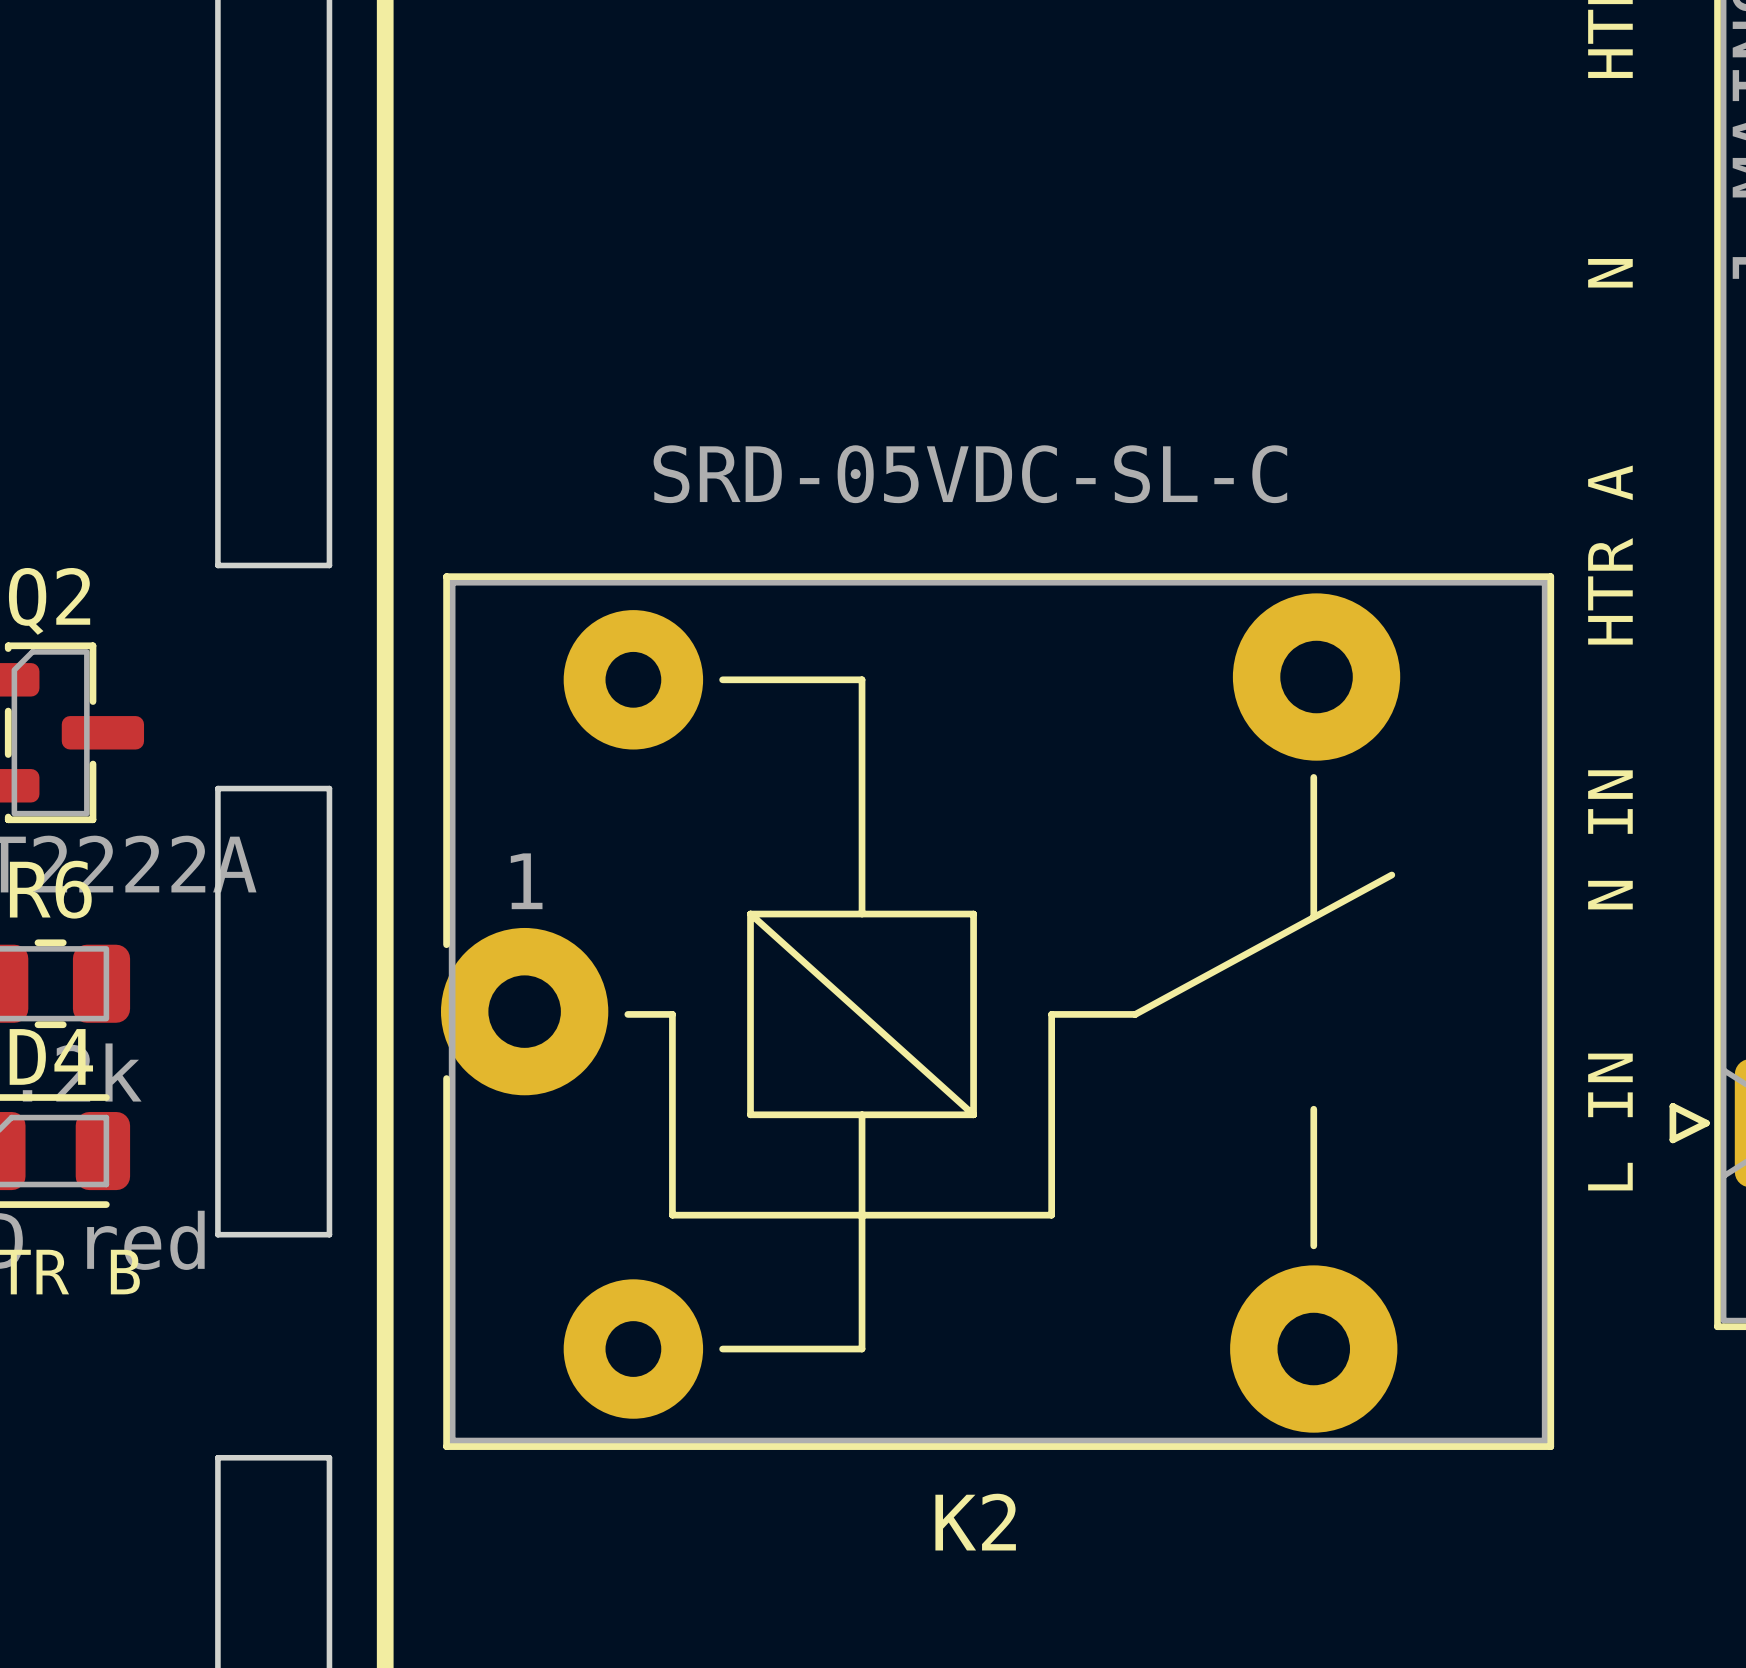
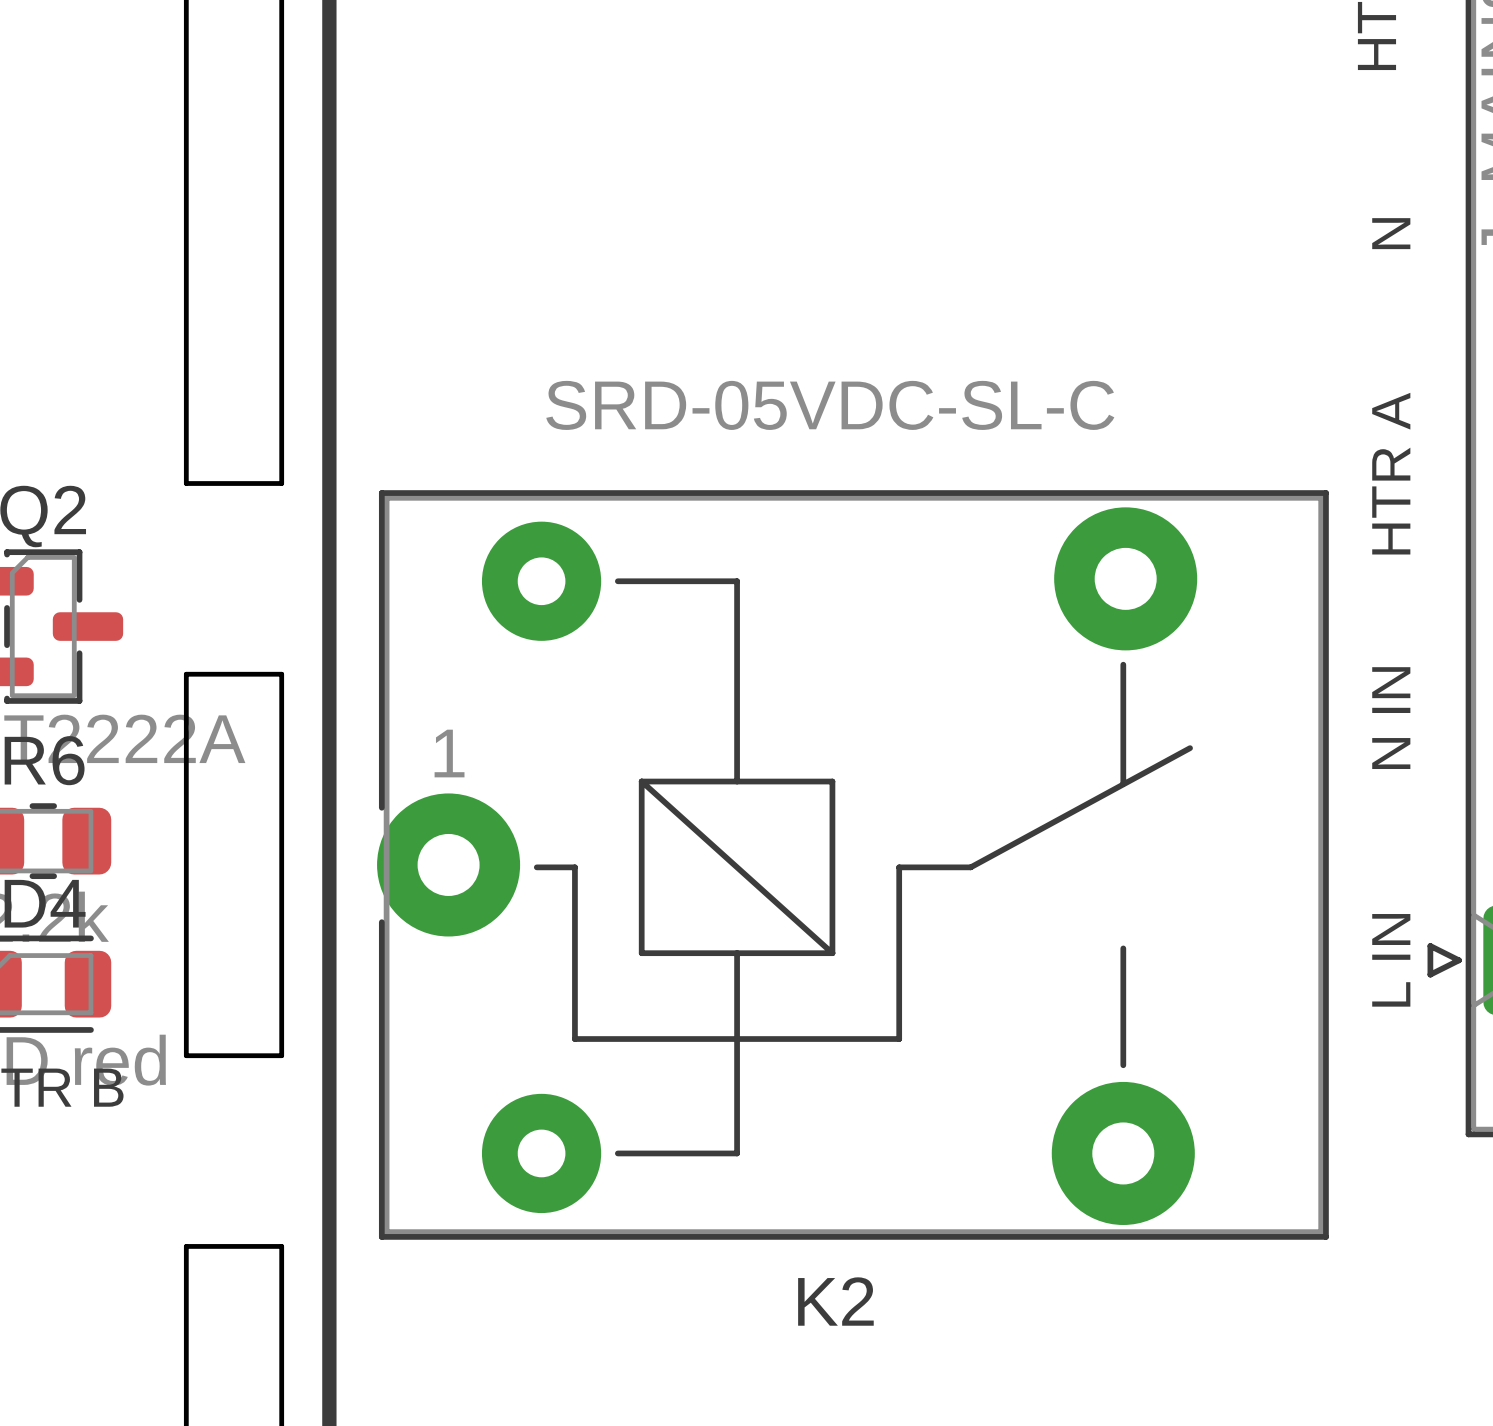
text position: N (1610, 273) -> N (1391, 233)
text position: HTR A (1610, 555) -> HTR A (1391, 473)
text position: N IN (1610, 839) -> N IN (1391, 718)
text position: L IN (1610, 1122) -> L IN (1391, 960)

